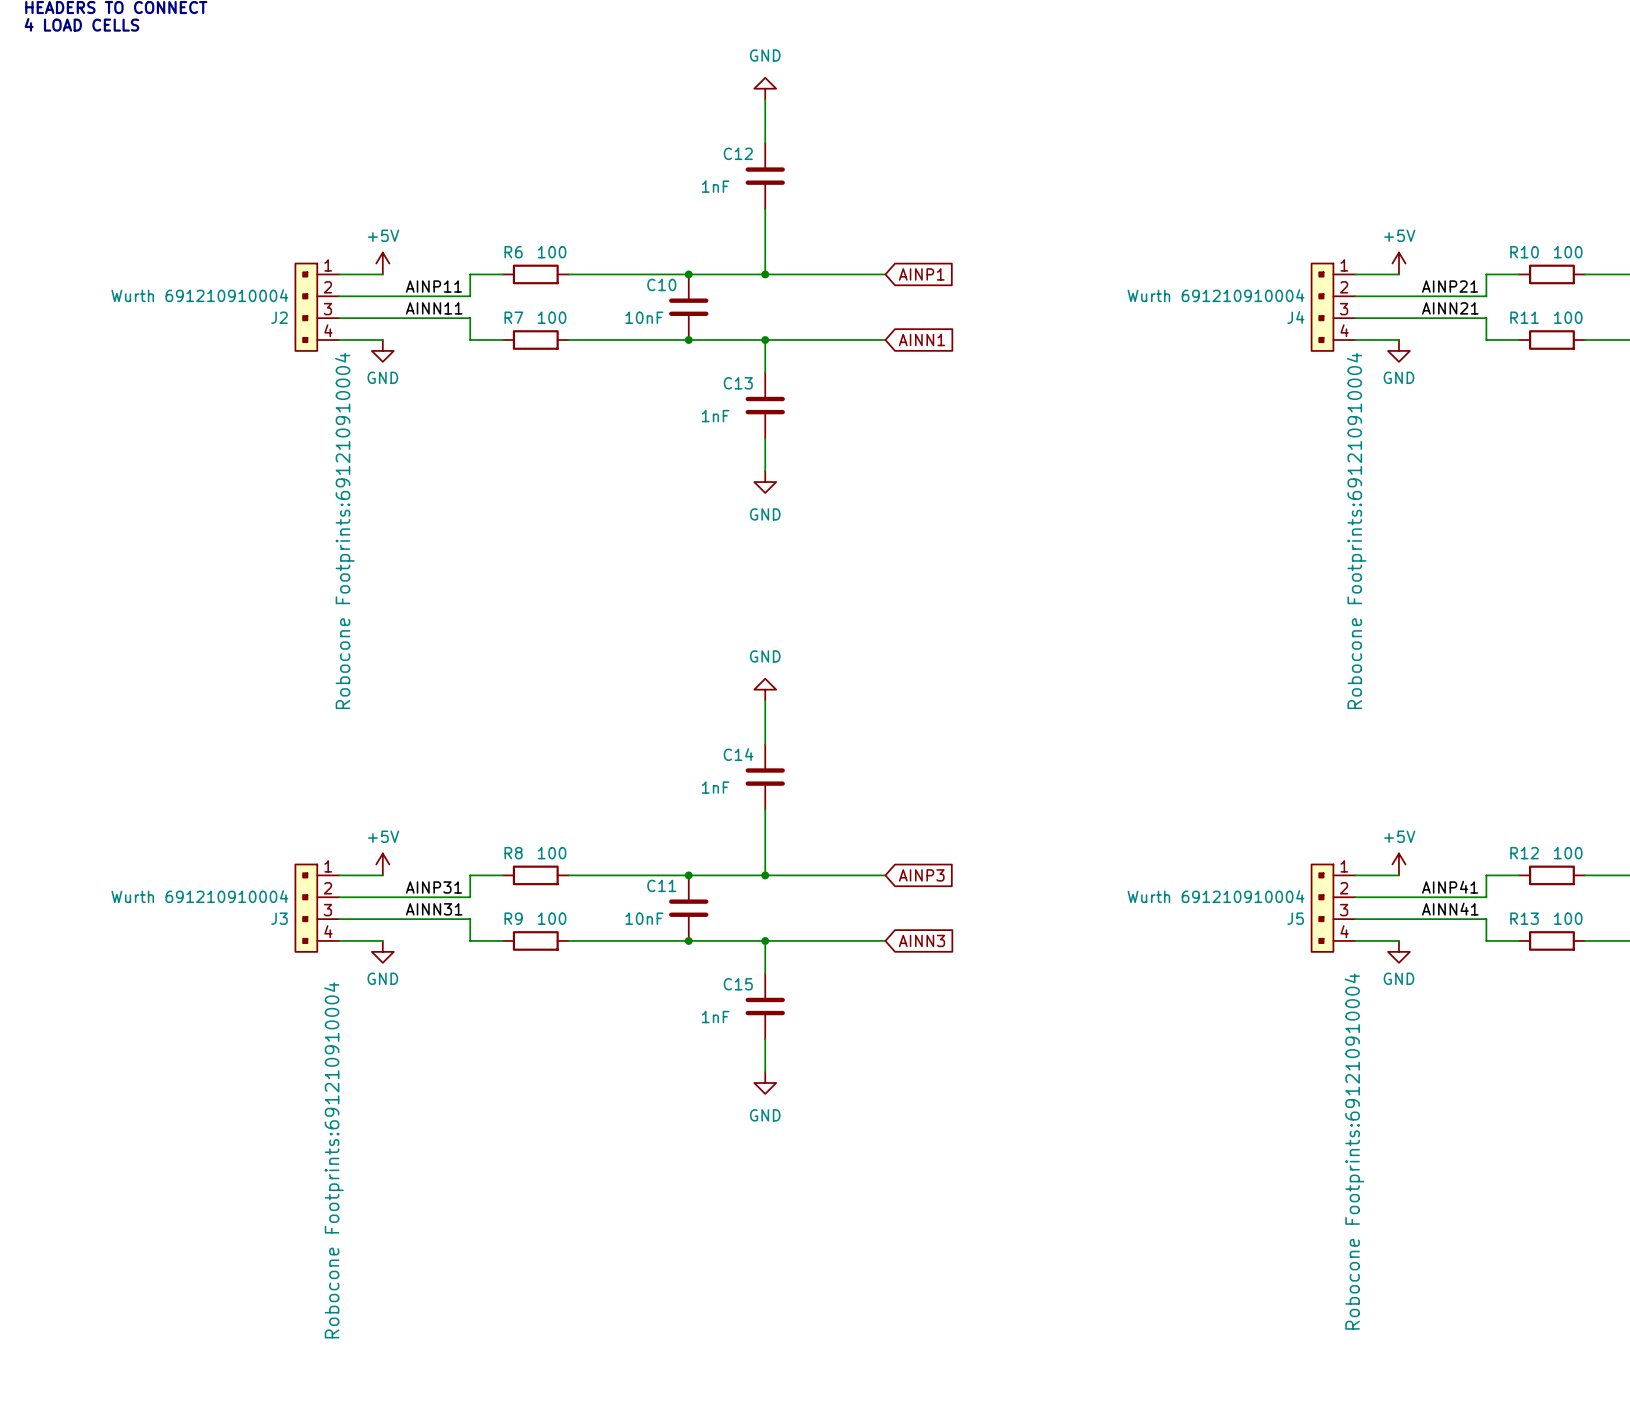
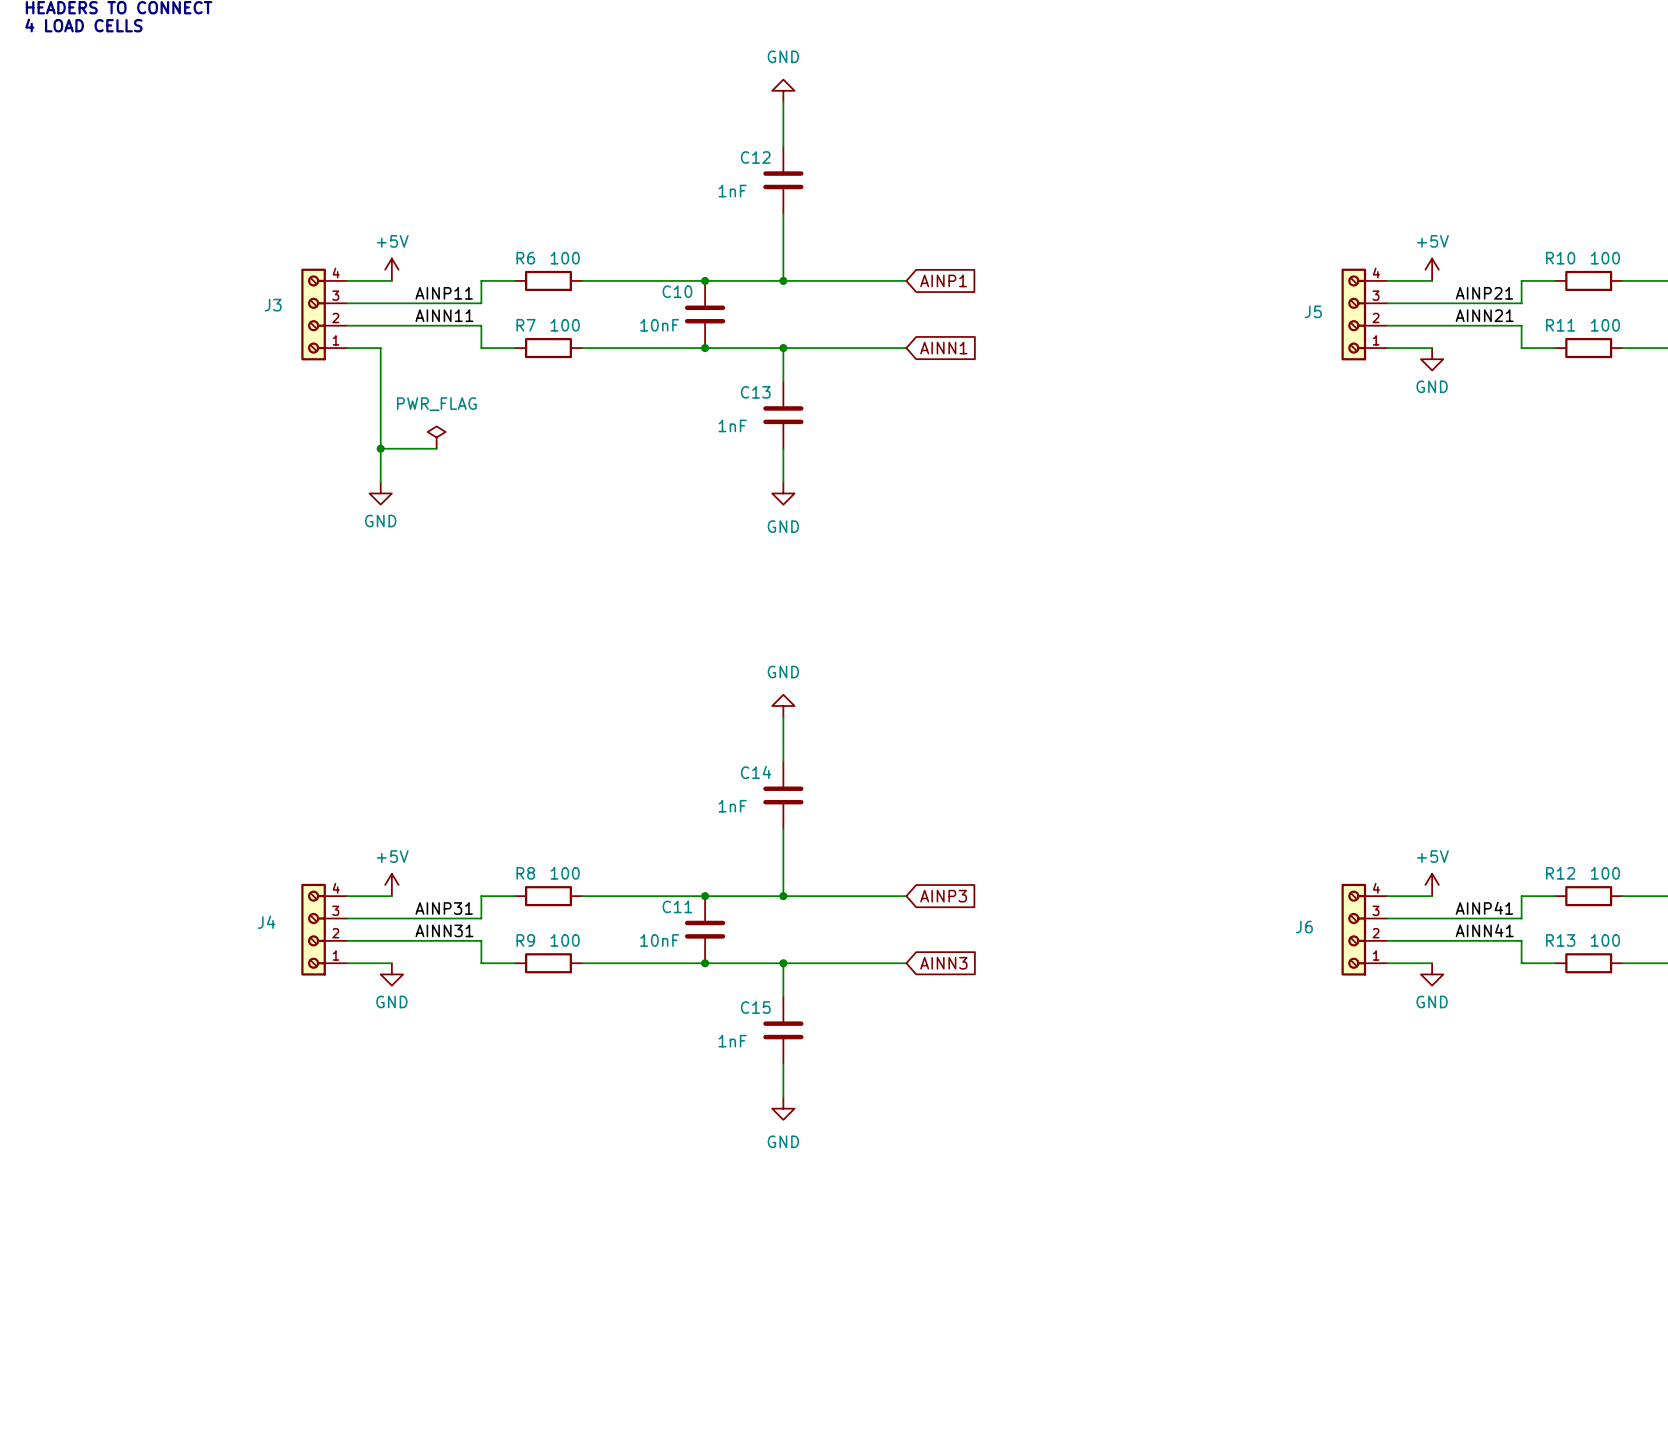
J4 symbol: [1311, 263, 1356, 351] -> [301, 883, 348, 976]
J4 value: Wurth 691210910004 (1216, 295) -> none
J2: Wurth 691210910004 (317, 307) -> none
J4 name position: J4 (1295, 317) -> J4 (266, 922)
wire: (371, 340) (382, 340) -> (380, 348) (380, 482)
power symbol position: GND (382, 350) -> GND (380, 493)
power symbol: none -> PWR_FLAG (436, 437)
wire: none -> (380, 448) (436, 448)
junction: none -> (380, 448)
J4 text: Robocone Footprints:691210910004 (1356, 530) -> none
J3 symbol: [295, 864, 340, 952] -> [301, 268, 348, 361]
J5 symbol: [1311, 864, 1356, 952] -> [1341, 268, 1388, 361]
J3 value: Wurth 691210910004 (199, 896) -> none
J5 value: Wurth 691210910004 (1216, 896) -> none
J6: none -> (1364, 929)
J3 name position: J3 (279, 918) -> J3 (273, 305)
J5 text: Robocone Footprints:691210910004 (1354, 1151) -> none
J3 text: Robocone Footprints:691210910004 (333, 1160) -> none

